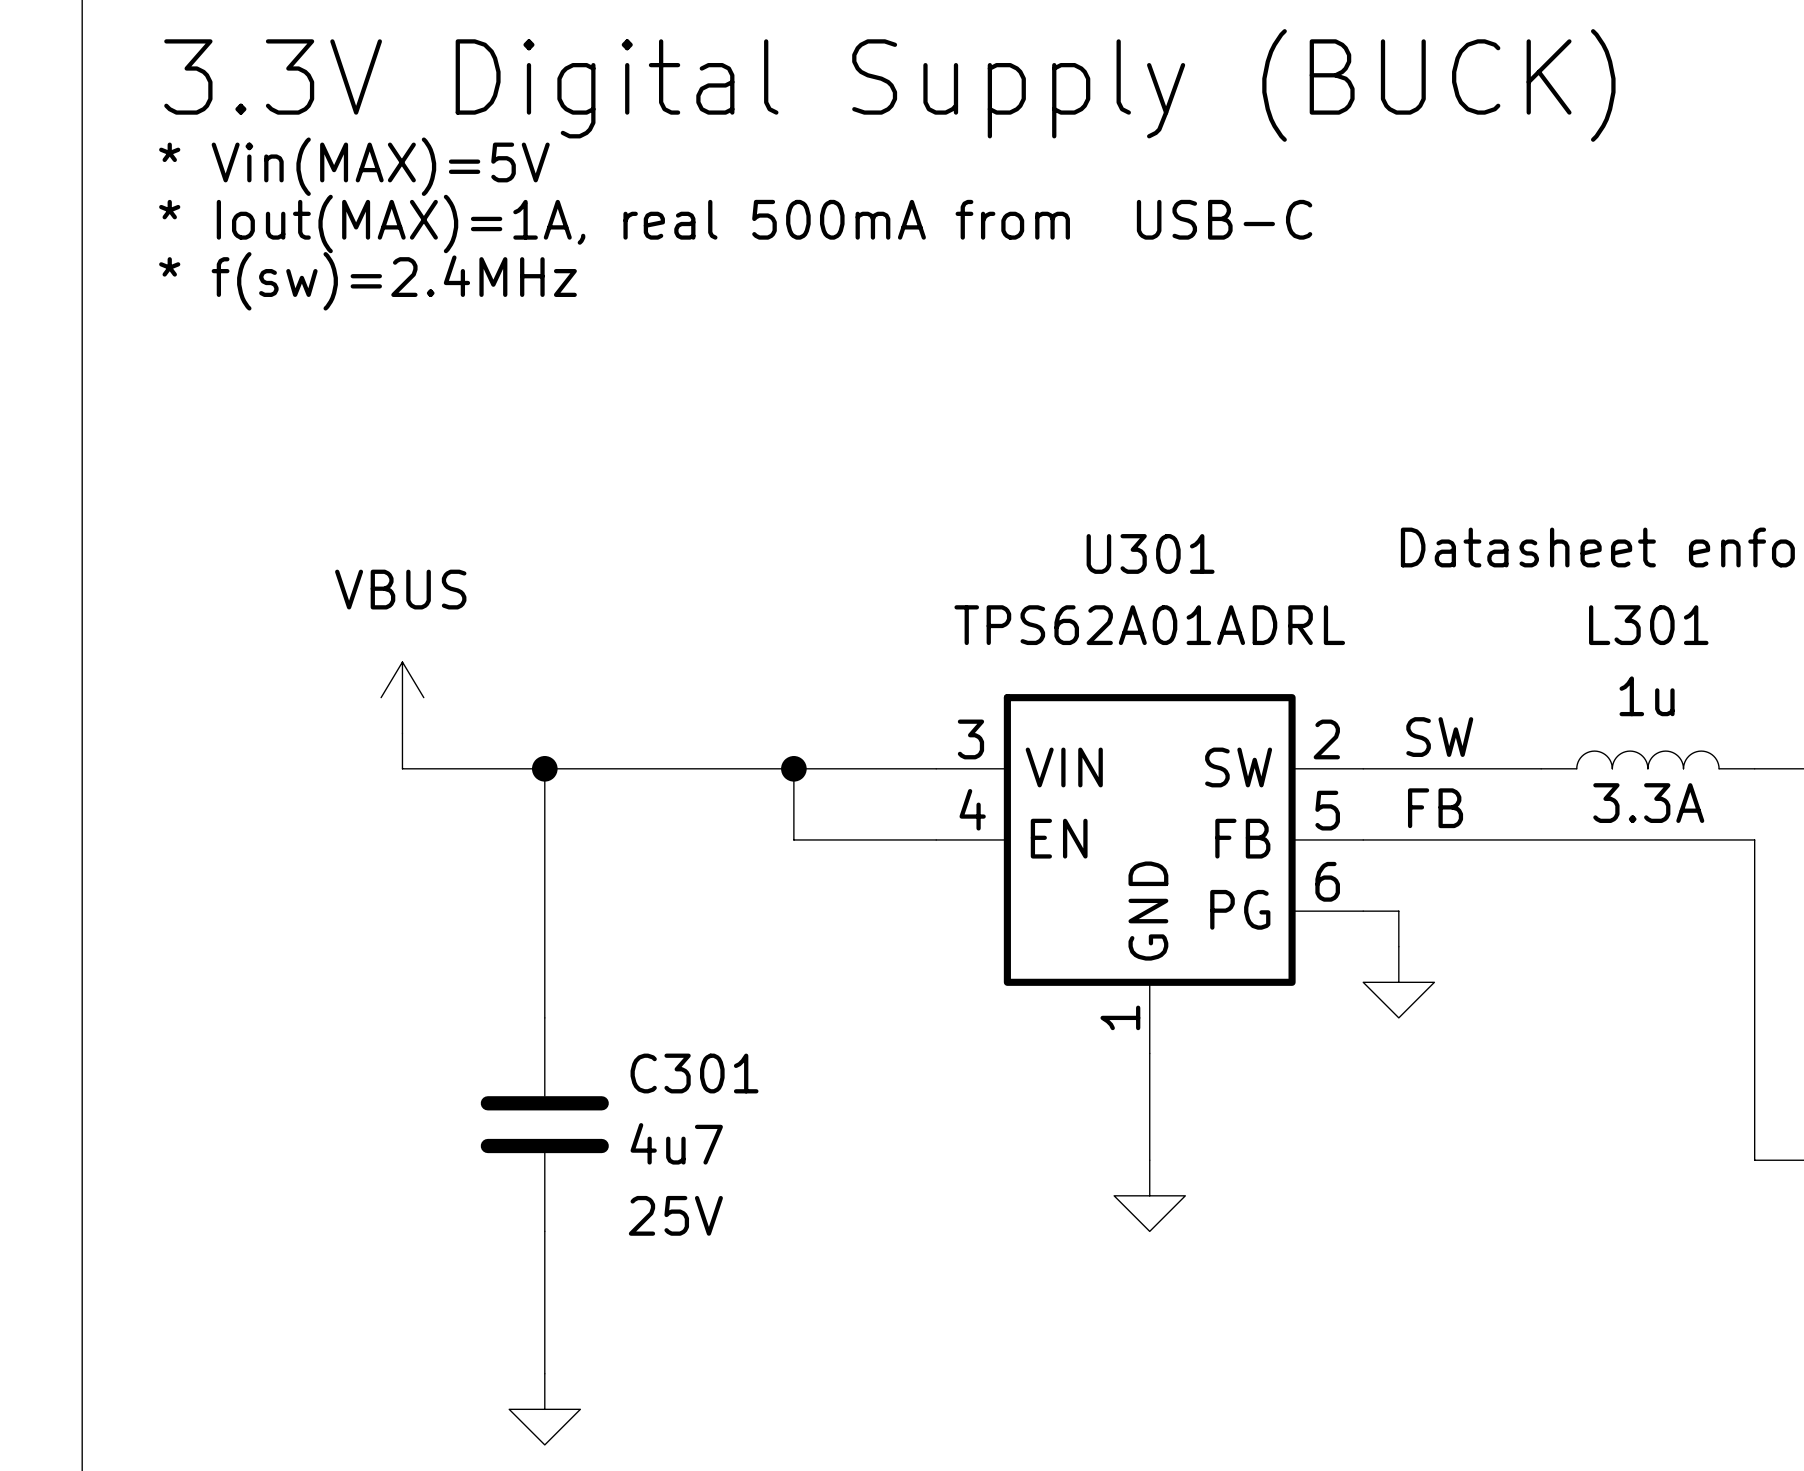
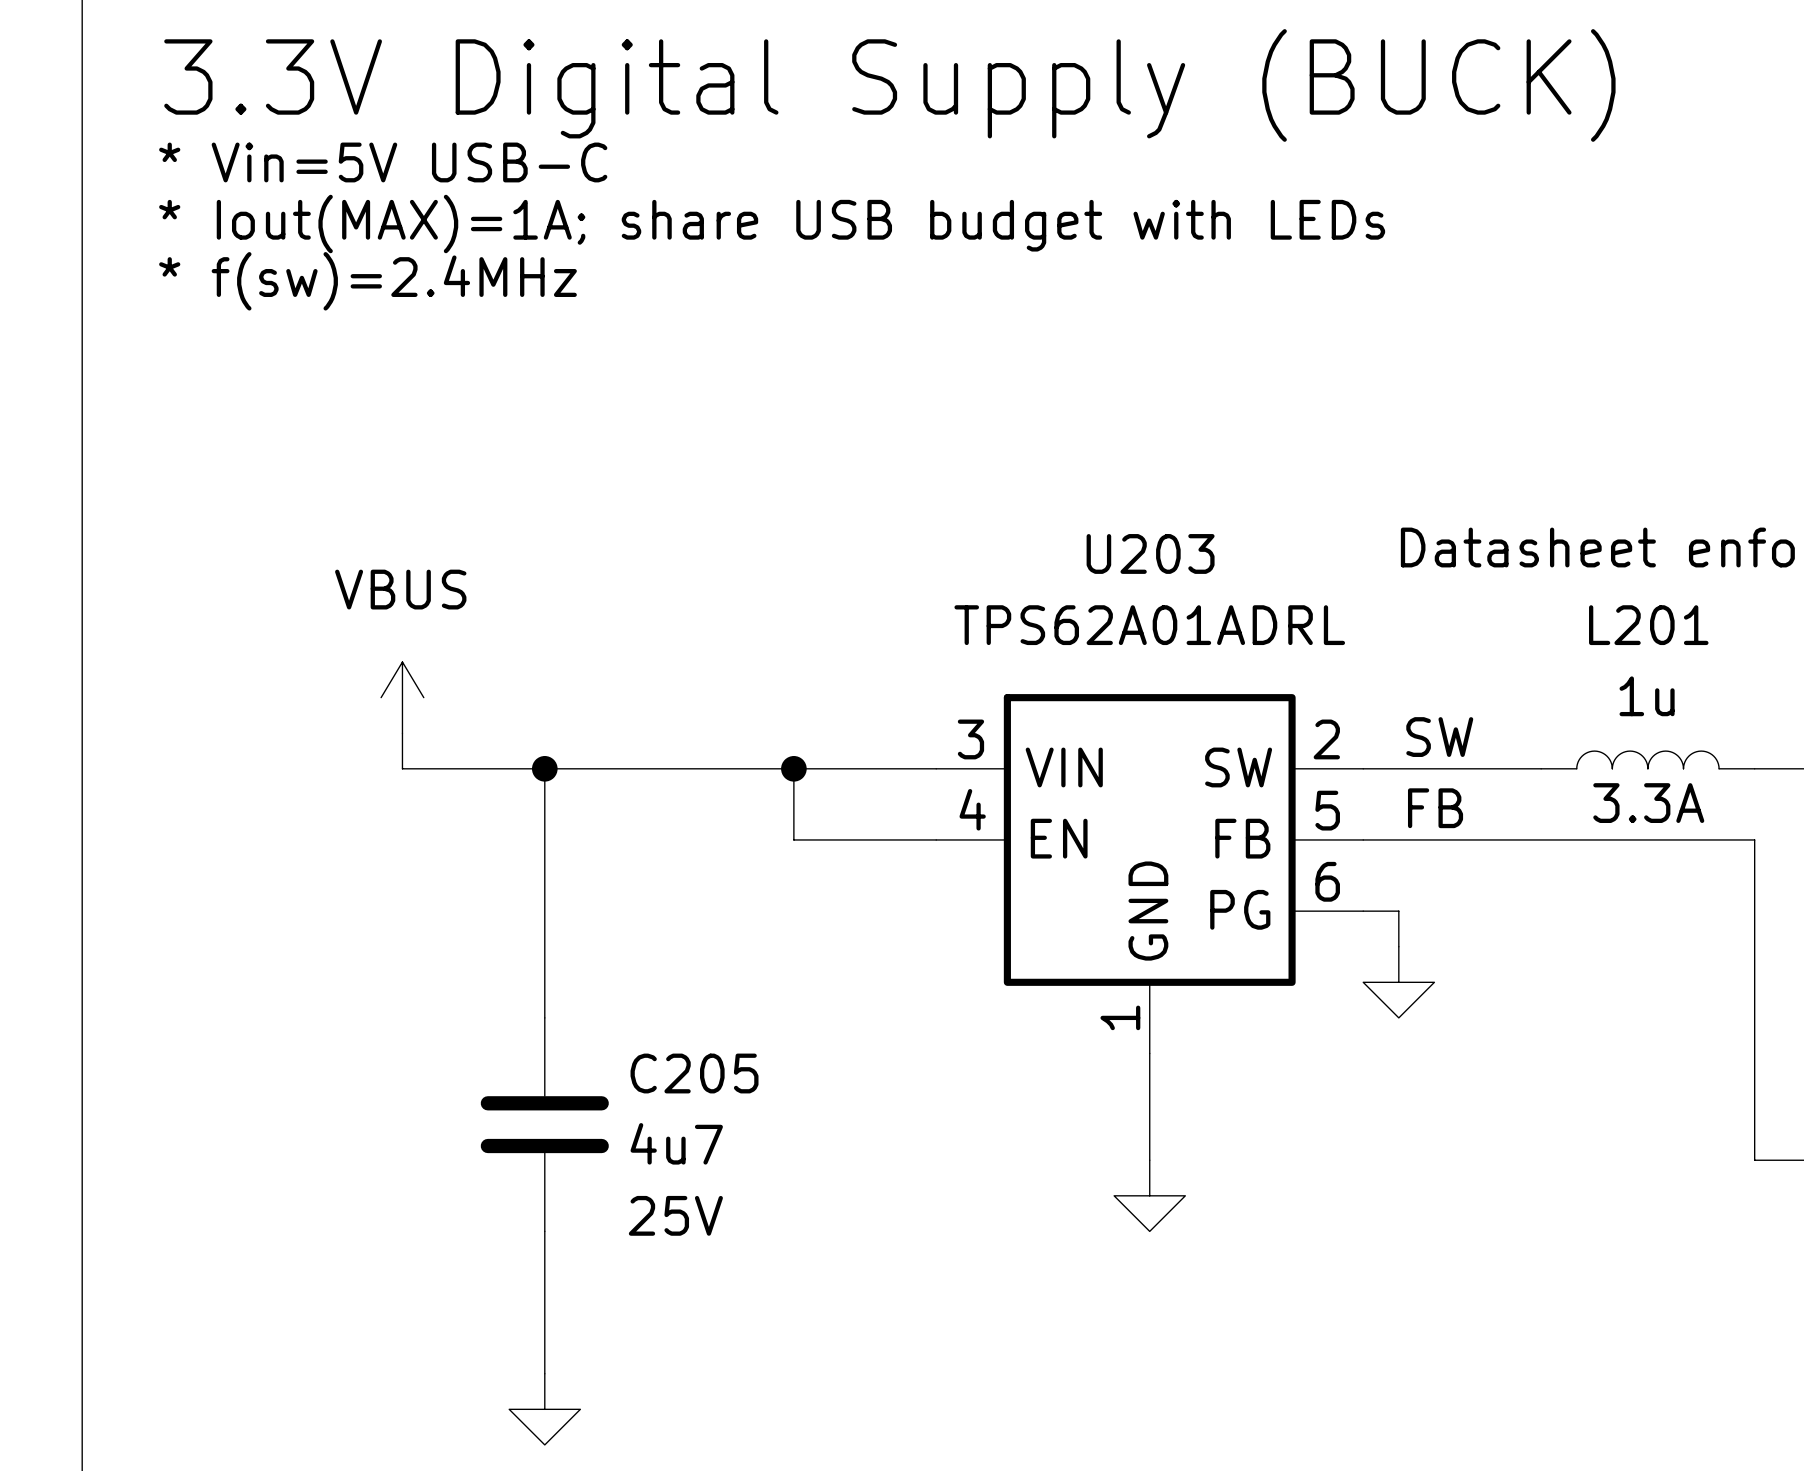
text: * Vin(MAX)=5V (354, 166) -> * Vin=5V USB-C (383, 162)
text: * Iout(MAX)=1A, real 500mA from USB-C (735, 224) -> * Iout(MAX)=1A; share USB budget with LEDs (772, 224)
U301 name: U301 (1150, 553) -> U203 (1150, 553)
L301 name: L301 (1648, 625) -> L201 (1648, 625)
C301 name: C301 (694, 1073) -> C205 (694, 1073)

